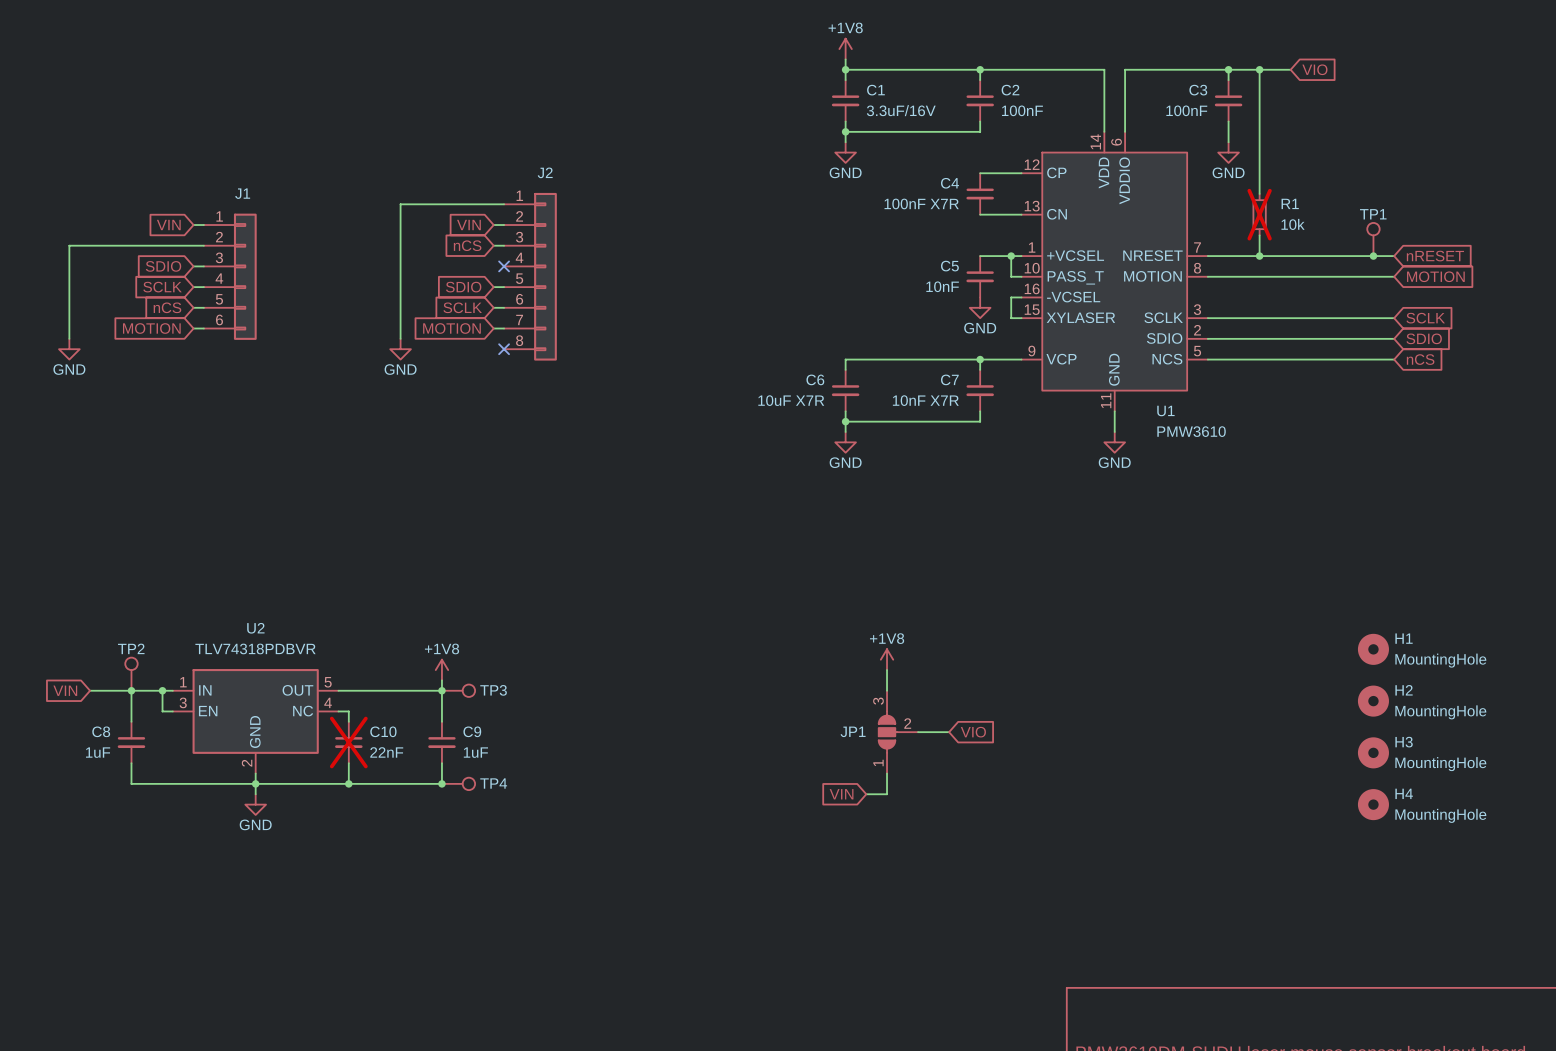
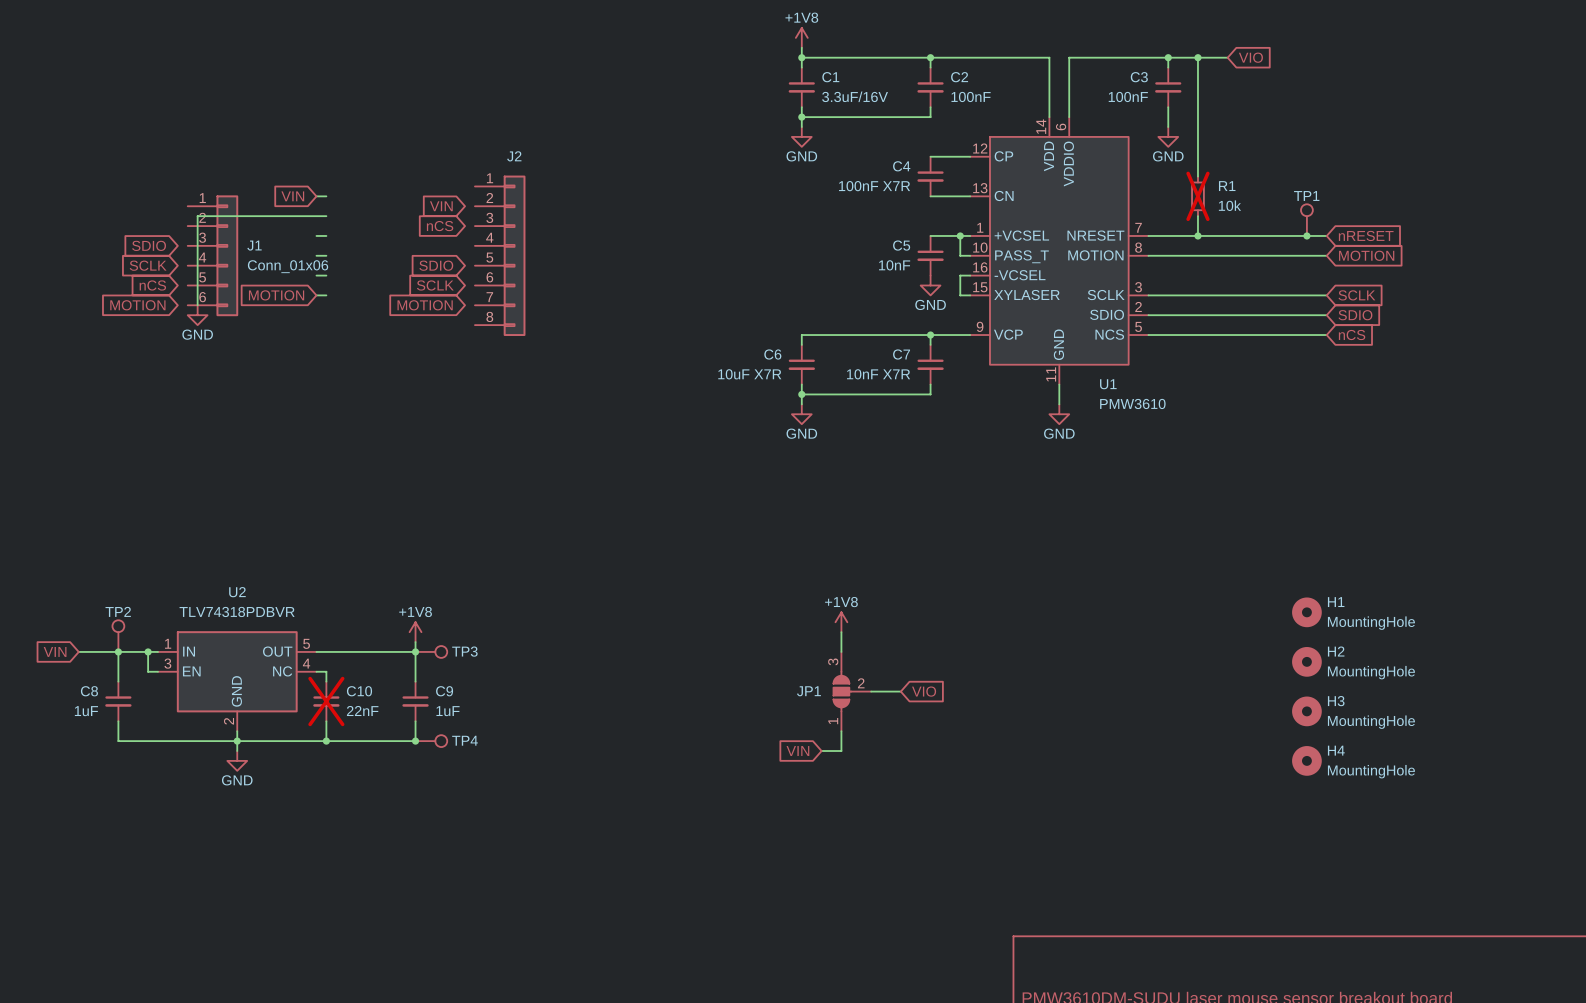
J1 name position: J1 (242, 193) -> J1 (254, 245)
wire: (504, 204) (400, 204) (400, 338) -> none
global label position: VIN (168, 225) -> VIN (292, 196)
wire: (193, 225) (203, 225) -> (316, 196) (326, 196)
wire: (493, 225) (504, 225) -> none
wire: (203, 245) (69, 245) (69, 338) -> (326, 216) (197, 216) (197, 305)
wire: (493, 245) (504, 245) -> none
wire: (193, 266) (203, 266) -> (316, 235) (326, 235)
no-connect mark: (504, 266) -> none
wire: (193, 287) (203, 287) -> (316, 255) (326, 255)
wire: (493, 287) (504, 287) -> none
J1 value: none -> Conn_01x06 (288, 266)
wire: (193, 307) (203, 307) -> (316, 275) (326, 275)
wire: (493, 307) (504, 307) -> none
global label: none -> MOTION (276, 295)
wire: (193, 328) (203, 328) -> (316, 295) (326, 295)
wire: (493, 328) (504, 328) -> none
power symbol: none -> GND (197, 315)
power symbol: GND (69, 349) -> none
power symbol: GND (400, 349) -> none
no-connect mark: (504, 349) -> none

